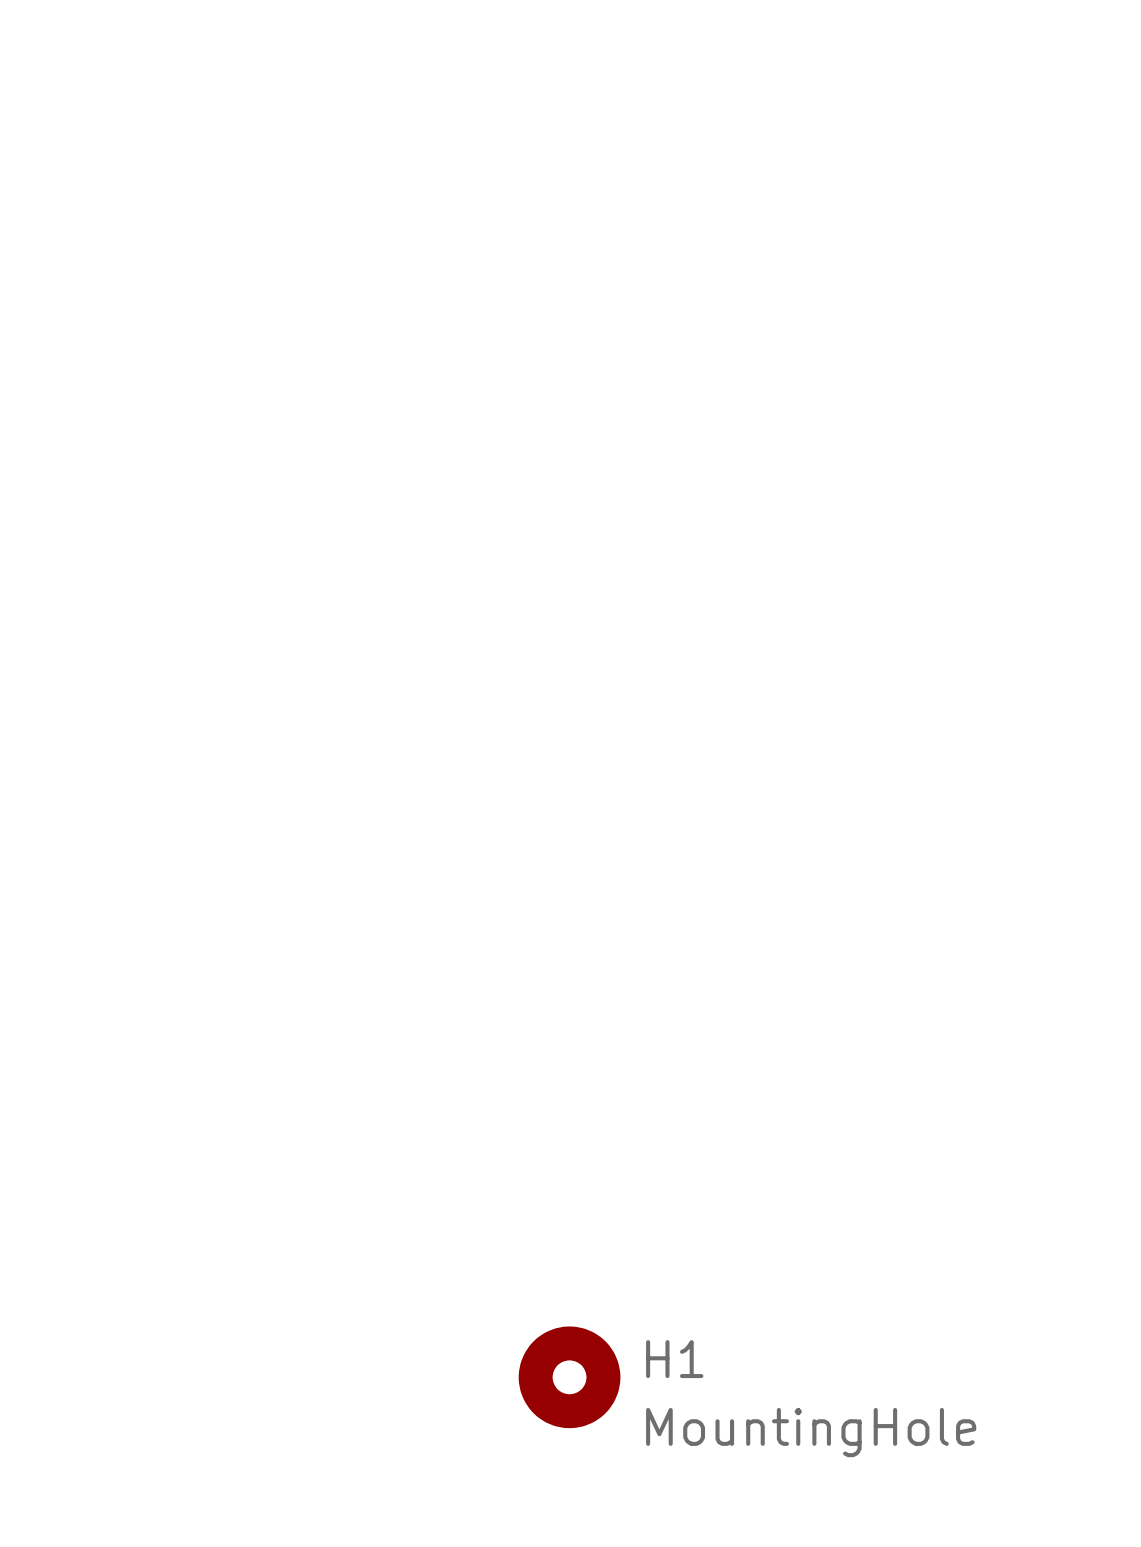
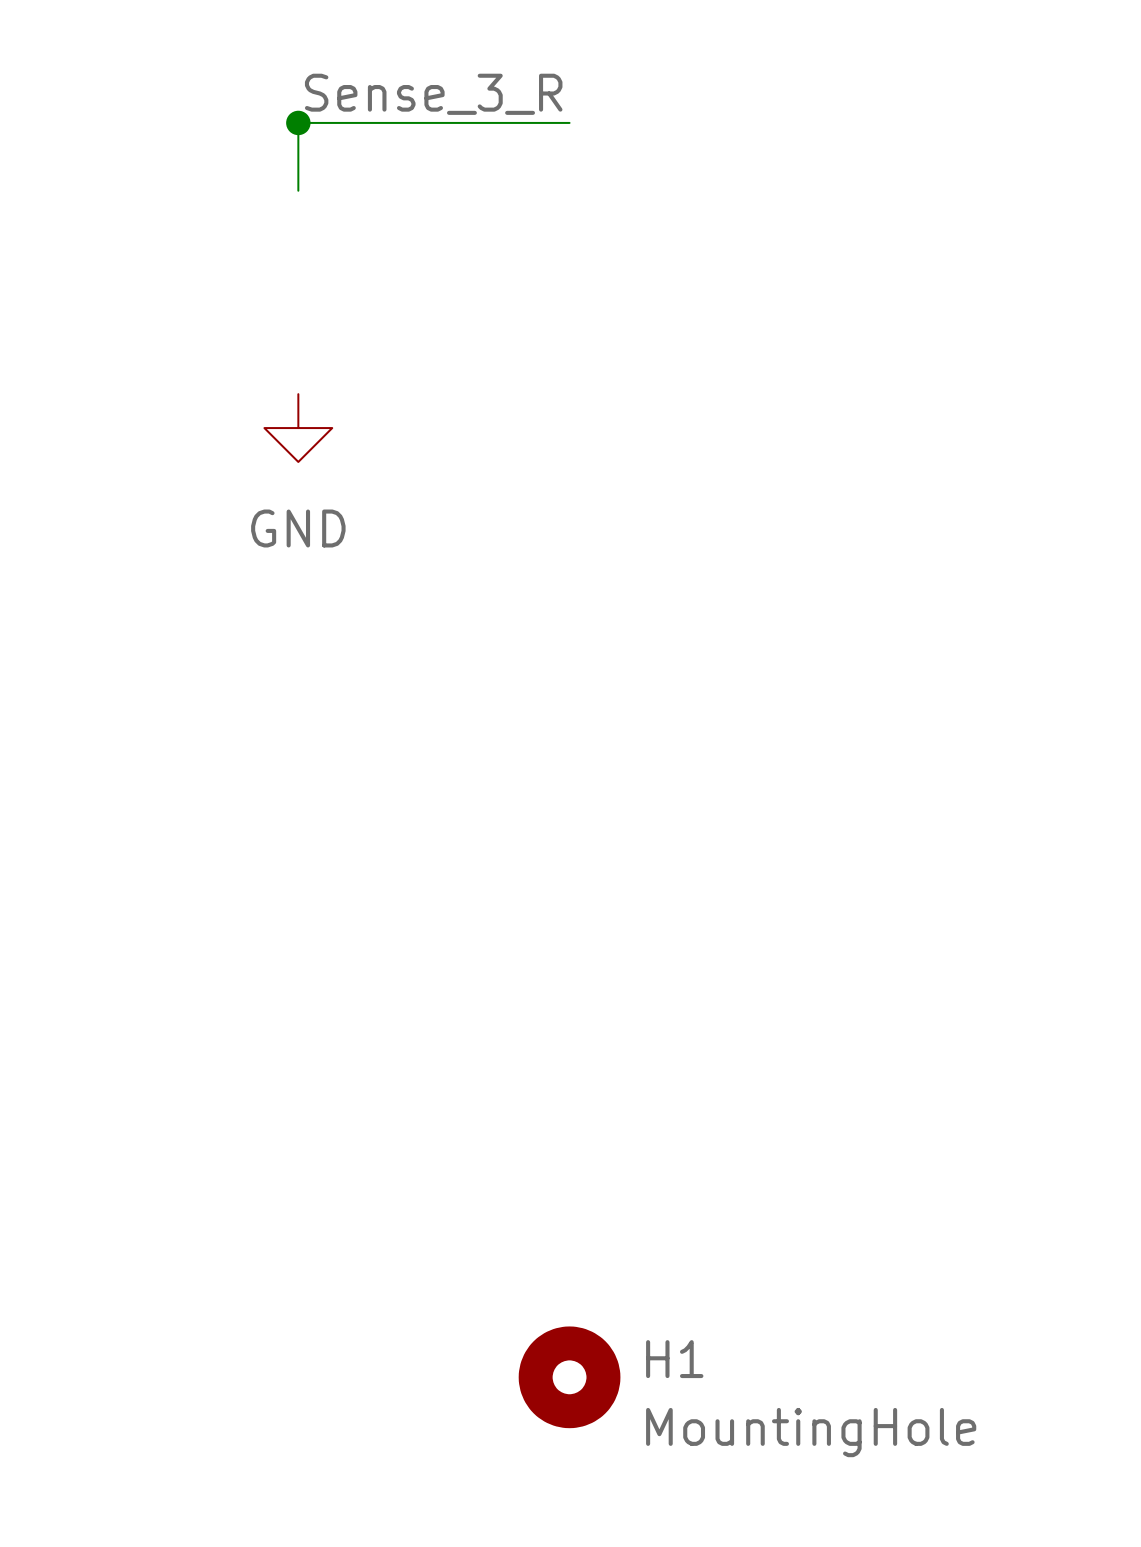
label: none -> Sense_3_R (433, 94)
junction: none -> (298, 122)
wire: none -> (569, 122) (298, 122) (298, 190)
power symbol: none -> GND (298, 428)

